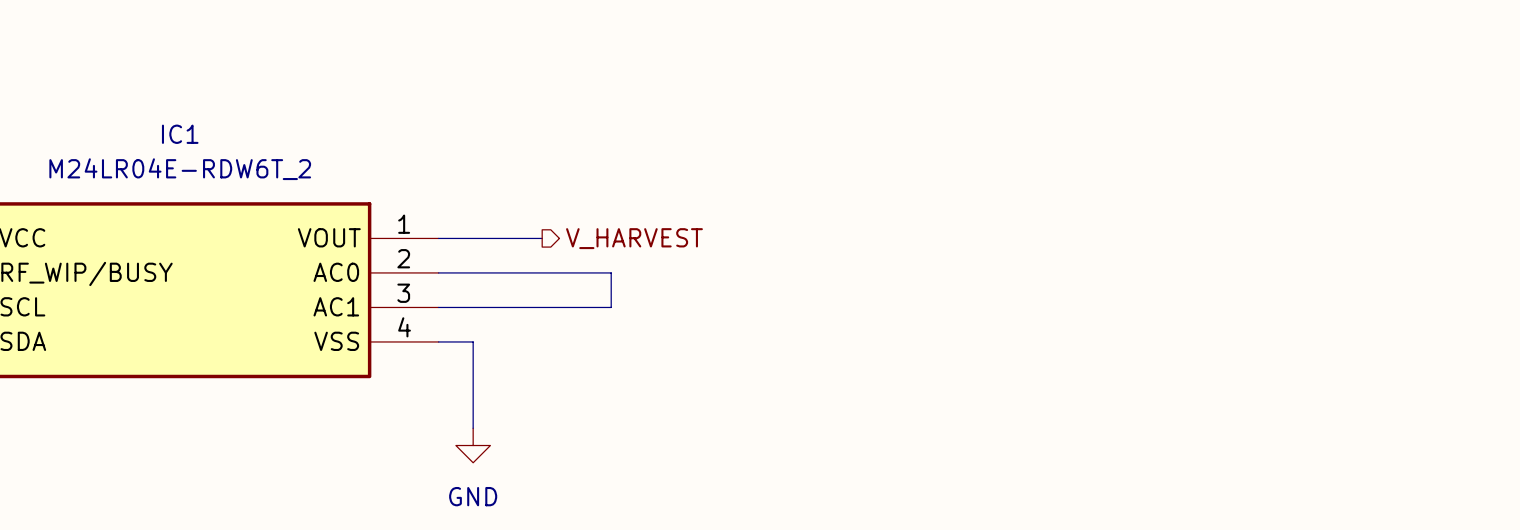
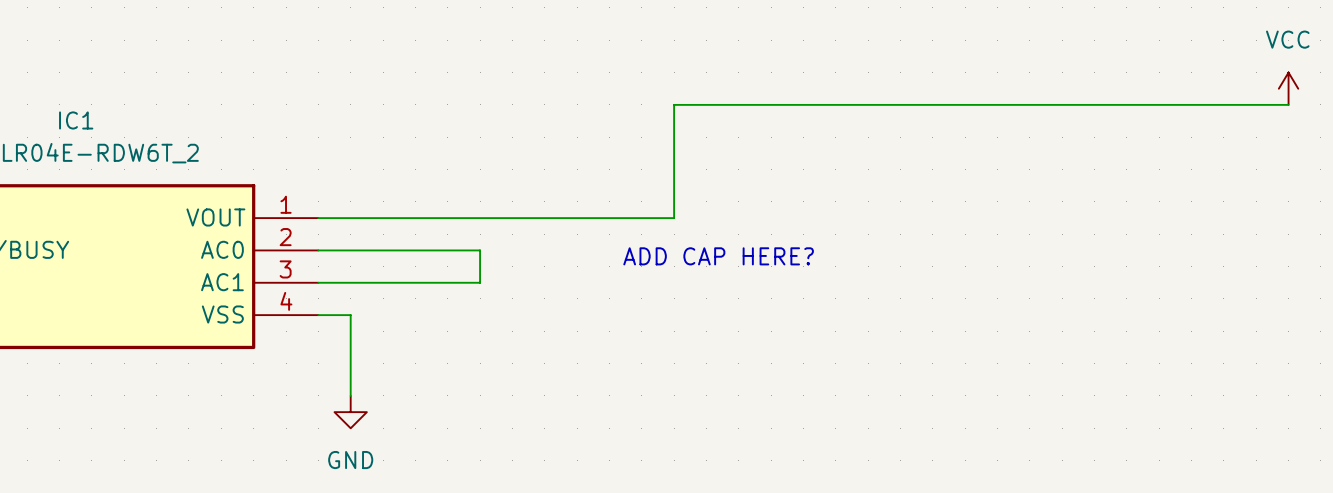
power symbol: none -> VCC (1288, 88)
wire: none -> (1288, 104) (674, 104) (674, 218) (415, 218)
hierarchical label: V_HARVEST (634, 238) -> none
text: none -> ADD CAP HERE? (718, 256)

